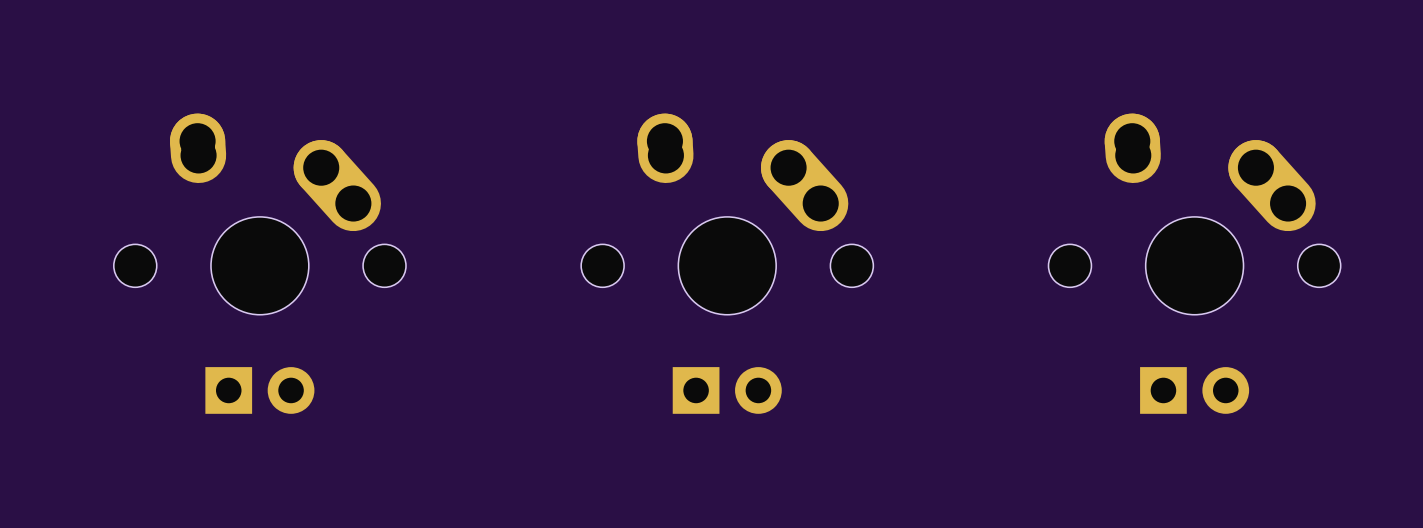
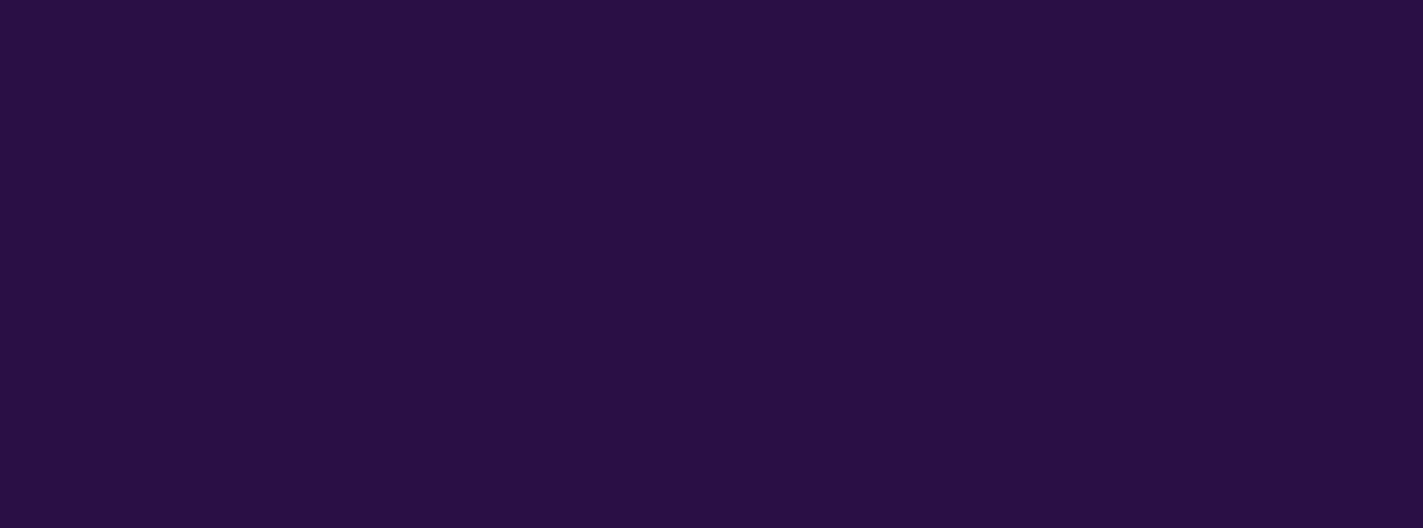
part: (259, 263) -> none
part: (727, 263) -> none
part: (1194, 263) -> none

